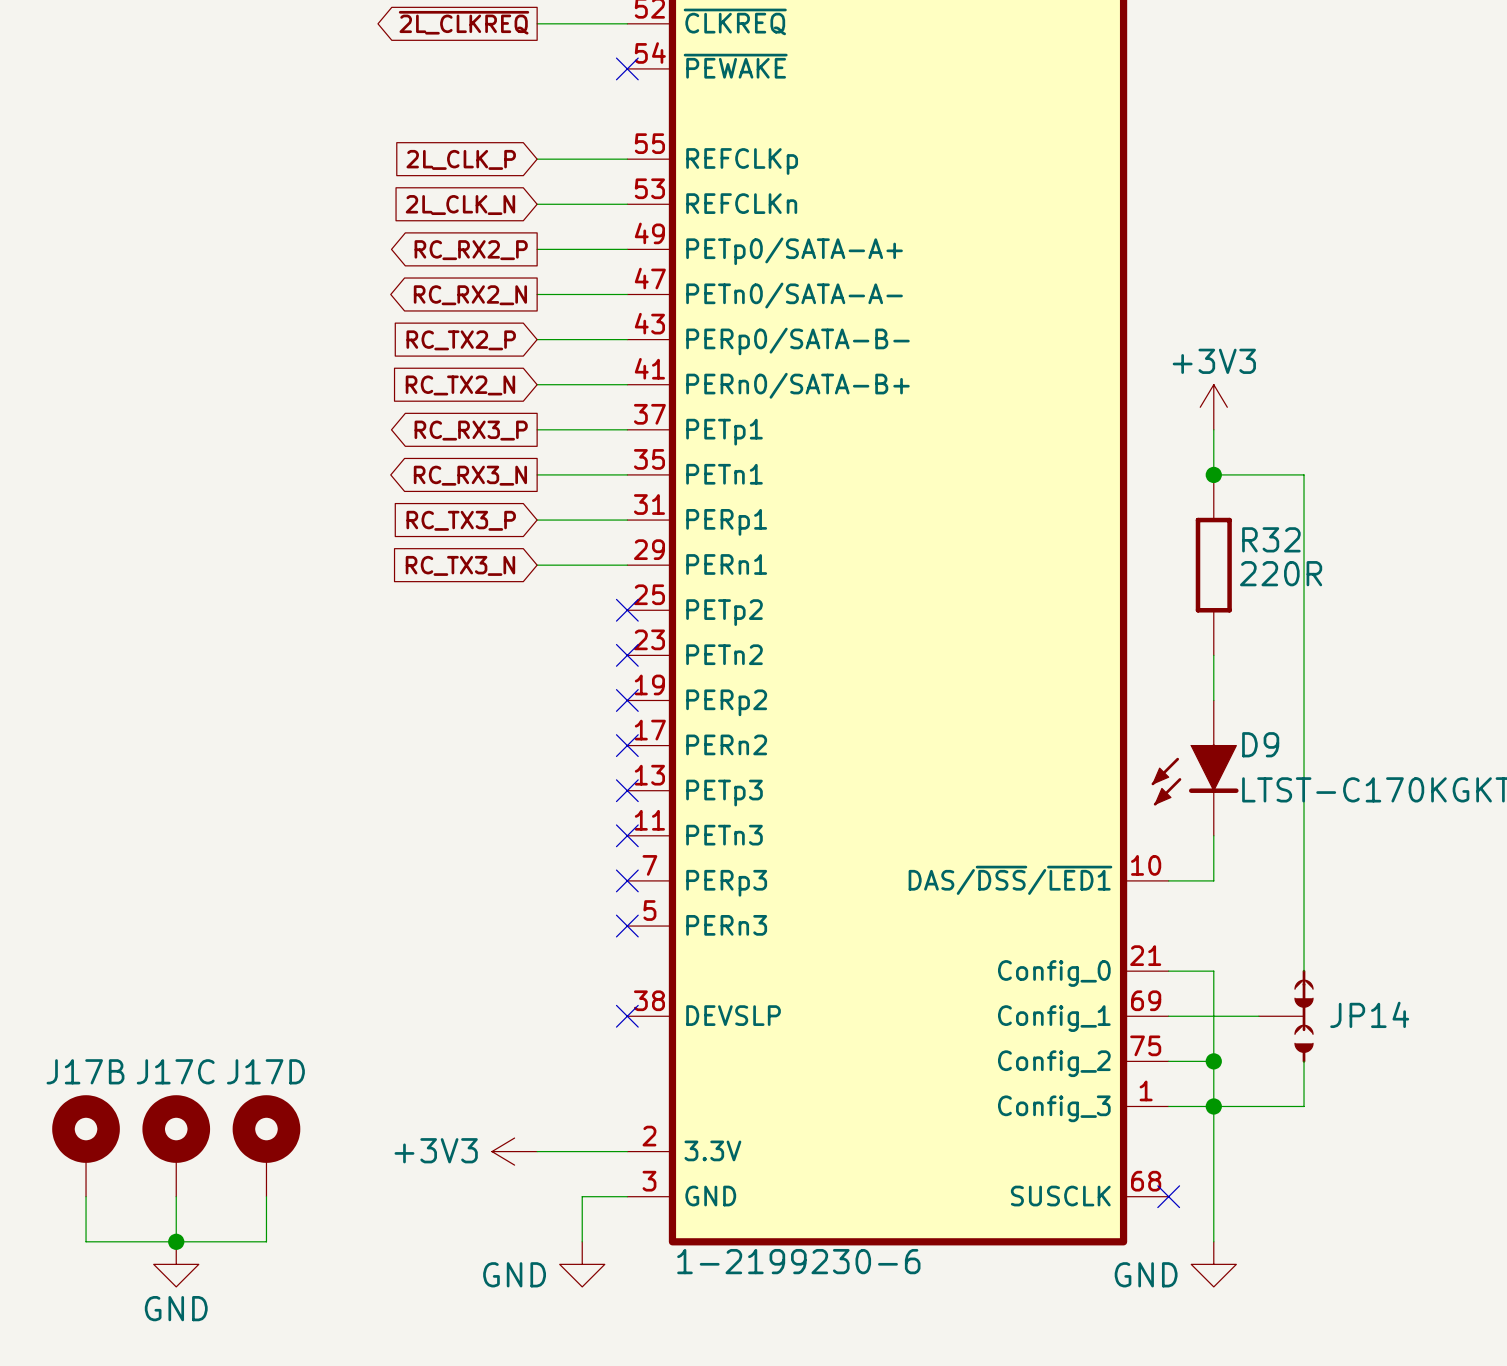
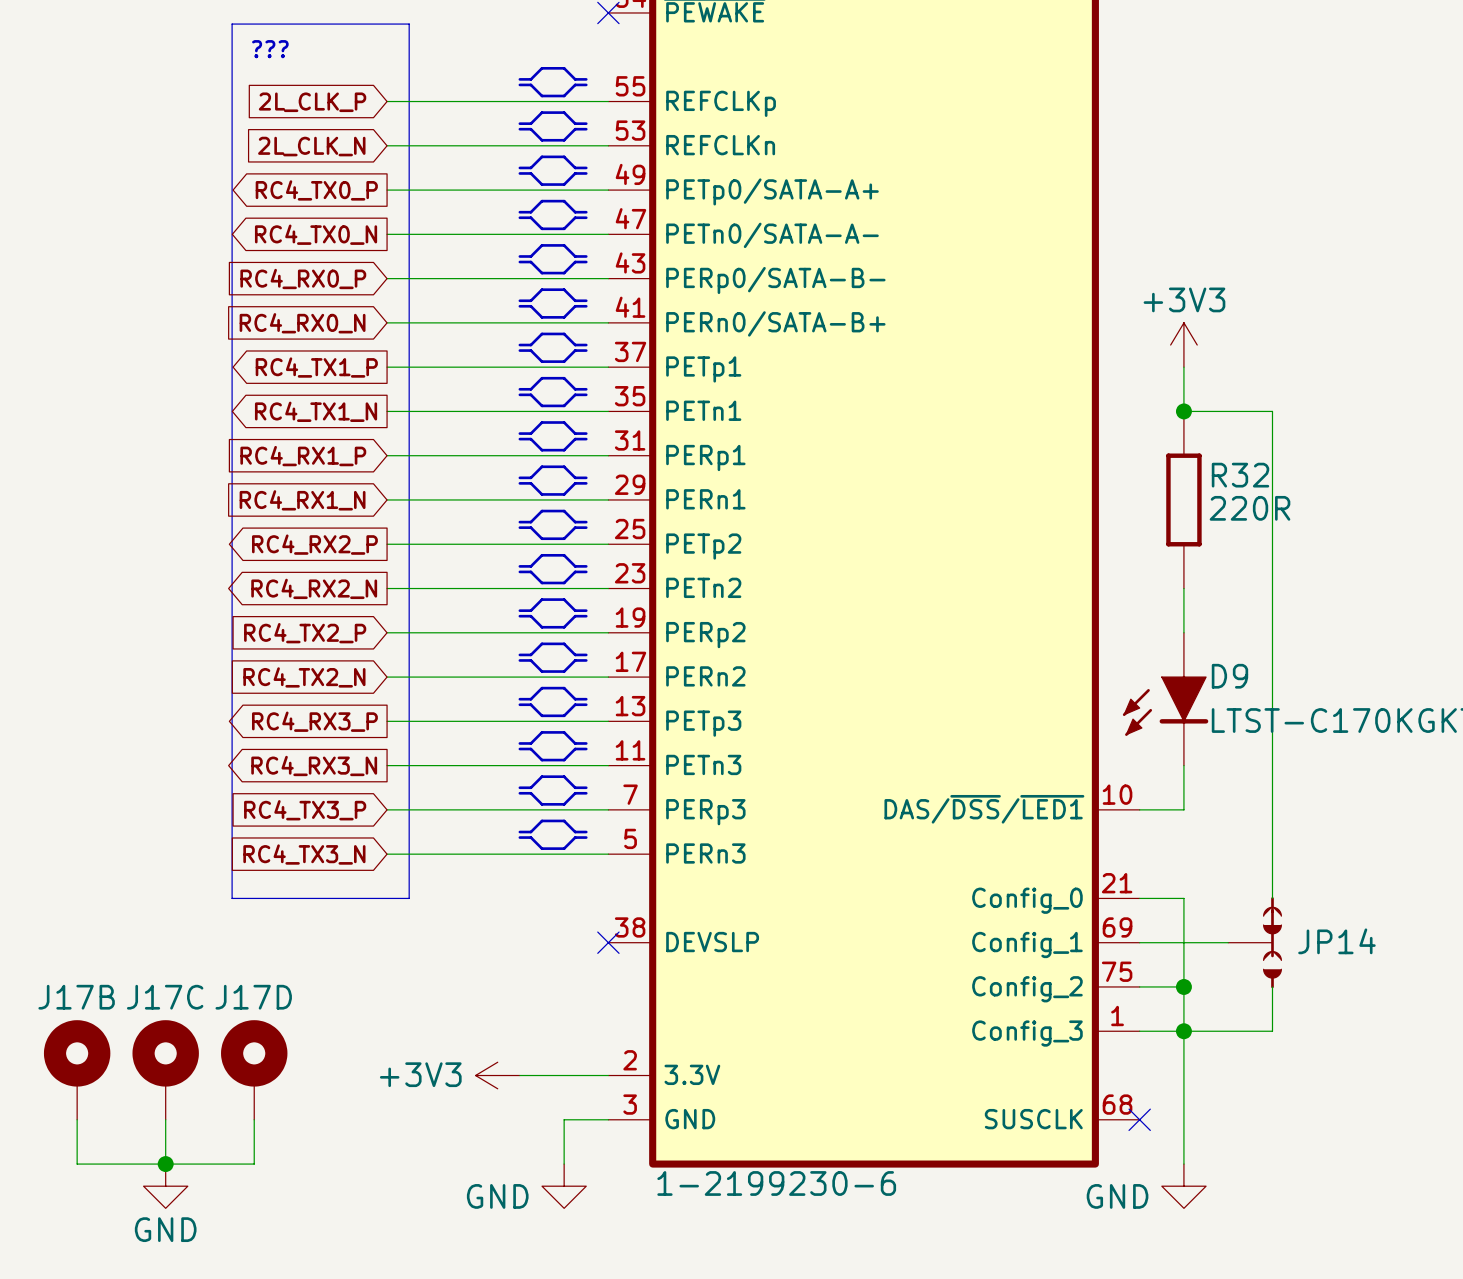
line: none -> (232, 24) (409, 24) (409, 898) (232, 898) (232, 24)
text: none -> ??? (270, 49)
line: none -> (519, 79) (530, 79) (542, 68) (564, 68) (575, 79) (586, 79)
line: none -> (519, 84) (530, 84) (542, 95) (564, 95) (575, 84) (586, 84)
wire: none -> (387, 101) (519, 101)
global label position: 2L_CLK_P (461, 159) -> 2L_CLK_P (312, 102)
line: none -> (519, 123) (530, 123) (542, 112) (564, 112) (575, 123) (586, 123)
line: none -> (519, 129) (530, 129) (542, 140) (564, 140) (575, 129) (586, 129)
wire: none -> (387, 145) (519, 145)
global label position: 2L_CLK_N (460, 205) -> 2L_CLK_N (311, 146)
line: none -> (519, 167) (530, 167) (542, 156) (564, 156) (575, 167) (586, 167)
line: none -> (519, 173) (530, 173) (542, 184) (564, 184) (575, 173) (586, 173)
wire: none -> (387, 190) (519, 190)
global label: RC_RX2_P (471, 250) -> RC4_TX0_P (316, 190)
line: none -> (519, 212) (530, 212) (542, 201) (564, 201) (575, 212) (586, 212)
line: none -> (519, 217) (530, 217) (542, 228) (564, 228) (575, 217) (586, 217)
wire: none -> (387, 234) (519, 234)
global label: RC_RX2_N (470, 295) -> RC4_TX0_N (316, 234)
line: none -> (519, 256) (530, 256) (542, 245) (564, 245) (575, 256) (586, 256)
line: none -> (519, 262) (530, 262) (542, 273) (564, 273) (575, 262) (586, 262)
wire: none -> (387, 278) (519, 278)
global label: RC_TX2_P (461, 340) -> RC4_RX0_P (303, 278)
line: none -> (519, 300) (530, 300) (542, 289) (564, 289) (575, 300) (586, 300)
line: none -> (519, 306) (530, 306) (542, 317) (564, 317) (575, 306) (586, 306)
wire: none -> (387, 322) (519, 322)
global label: RC_TX2_N (460, 385) -> RC4_RX0_N (302, 323)
line: none -> (519, 345) (530, 345) (542, 333) (564, 333) (575, 345) (586, 345)
line: none -> (519, 350) (530, 350) (542, 361) (564, 361) (575, 350) (586, 350)
wire: none -> (387, 367) (519, 367)
global label: RC_RX3_P (471, 430) -> RC4_TX1_P (316, 367)
line: none -> (519, 389) (530, 389) (542, 378) (564, 378) (575, 389) (586, 389)
line: none -> (519, 394) (530, 394) (542, 405) (564, 405) (575, 394) (586, 394)
wire: none -> (387, 411) (519, 411)
global label: RC_RX3_N (470, 475) -> RC4_TX1_N (316, 411)
line: none -> (519, 433) (530, 433) (542, 422) (564, 422) (575, 433) (586, 433)
line: none -> (519, 439) (530, 439) (542, 450) (564, 450) (575, 439) (586, 439)
wire: none -> (387, 455) (519, 455)
global label: RC_TX3_P (461, 520) -> RC4_RX1_P (303, 456)
line: none -> (519, 477) (530, 477) (542, 466) (564, 466) (575, 477) (586, 477)
line: none -> (519, 483) (530, 483) (542, 494) (564, 494) (575, 483) (586, 483)
wire: none -> (387, 499) (519, 499)
global label: RC_TX3_N (460, 565) -> RC4_RX1_N (302, 500)
line: none -> (519, 522) (530, 522) (542, 511) (564, 511) (575, 522) (586, 522)
line: none -> (519, 527) (530, 527) (542, 538) (564, 538) (575, 527) (586, 527)
global label: none -> RC4_RX2_P (314, 544)
wire: none -> (387, 544) (608, 544)
no-connect mark: (627, 610) -> none
line: none -> (519, 566) (530, 566) (542, 555) (564, 555) (575, 566) (586, 566)
line: none -> (519, 571) (530, 571) (542, 582) (564, 582) (575, 571) (586, 571)
global label: none -> RC4_RX2_N (314, 588)
wire: none -> (387, 588) (608, 588)
no-connect mark: (627, 655) -> none
line: none -> (519, 610) (530, 610) (542, 599) (564, 599) (575, 610) (586, 610)
line: none -> (519, 616) (530, 616) (542, 627) (564, 627) (575, 616) (586, 616)
global label: none -> RC4_TX2_P (305, 633)
wire: none -> (387, 632) (608, 632)
no-connect mark: (627, 700) -> none
line: none -> (519, 654) (530, 654) (542, 643) (564, 643) (575, 654) (586, 654)
line: none -> (519, 660) (530, 660) (542, 671) (564, 671) (575, 660) (586, 660)
global label: none -> RC4_TX2_N (304, 677)
wire: none -> (387, 677) (608, 677)
no-connect mark: (627, 745) -> none
line: none -> (519, 699) (530, 699) (542, 688) (564, 688) (575, 699) (586, 699)
line: none -> (519, 704) (530, 704) (542, 715) (564, 715) (575, 704) (586, 704)
wire: none -> (387, 721) (608, 721)
no-connect mark: (627, 790) -> none
global label: none -> RC4_RX3_P (314, 721)
line: none -> (519, 743) (530, 743) (542, 732) (564, 732) (575, 743) (586, 743)
line: none -> (519, 749) (530, 749) (542, 760) (564, 760) (575, 749) (586, 749)
wire: none -> (387, 765) (608, 765)
no-connect mark: (627, 835) -> none
global label: none -> RC4_RX3_N (314, 765)
line: none -> (519, 787) (530, 787) (542, 776) (564, 776) (575, 787) (586, 787)
line: none -> (519, 793) (530, 793) (542, 804) (564, 804) (575, 793) (586, 793)
wire: none -> (387, 809) (608, 809)
no-connect mark: (627, 880) -> none
global label: none -> RC4_TX3_P (305, 810)
line: none -> (519, 832) (530, 832) (542, 820) (564, 820) (575, 832) (586, 832)
line: none -> (519, 837) (530, 837) (542, 848) (564, 848) (575, 837) (586, 837)
global label: none -> RC4_TX3_N (304, 854)
wire: none -> (387, 854) (608, 854)
no-connect mark: (627, 926) -> none

